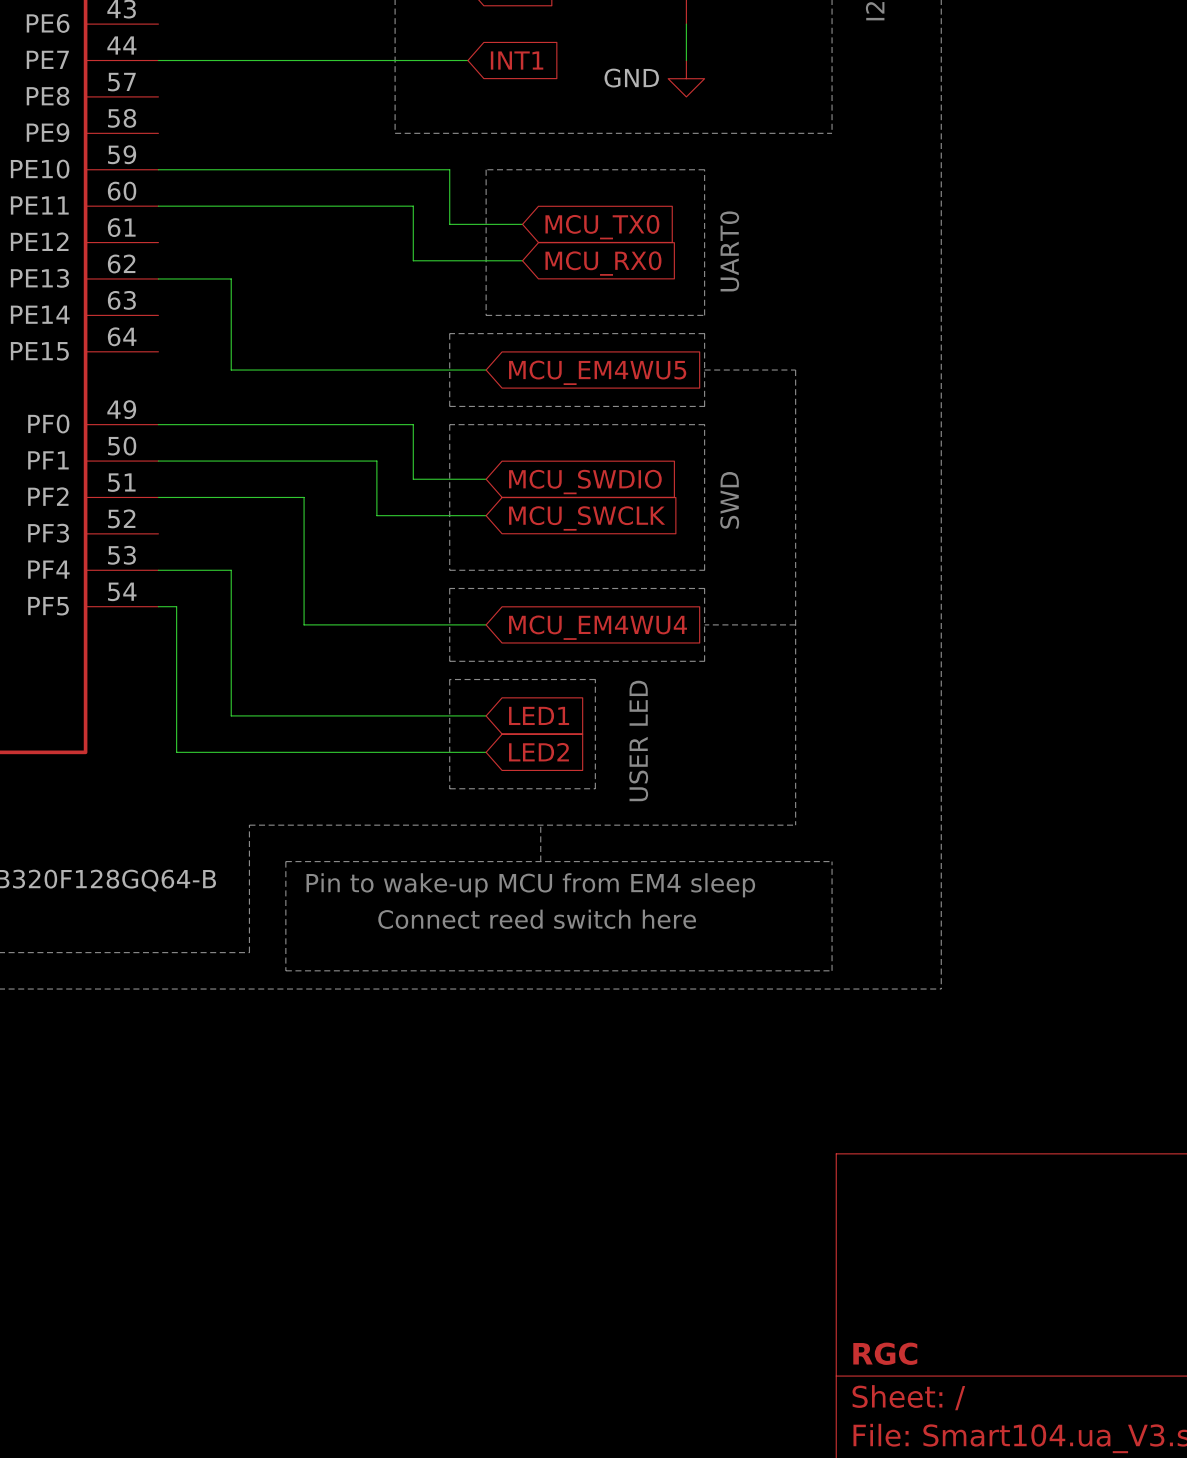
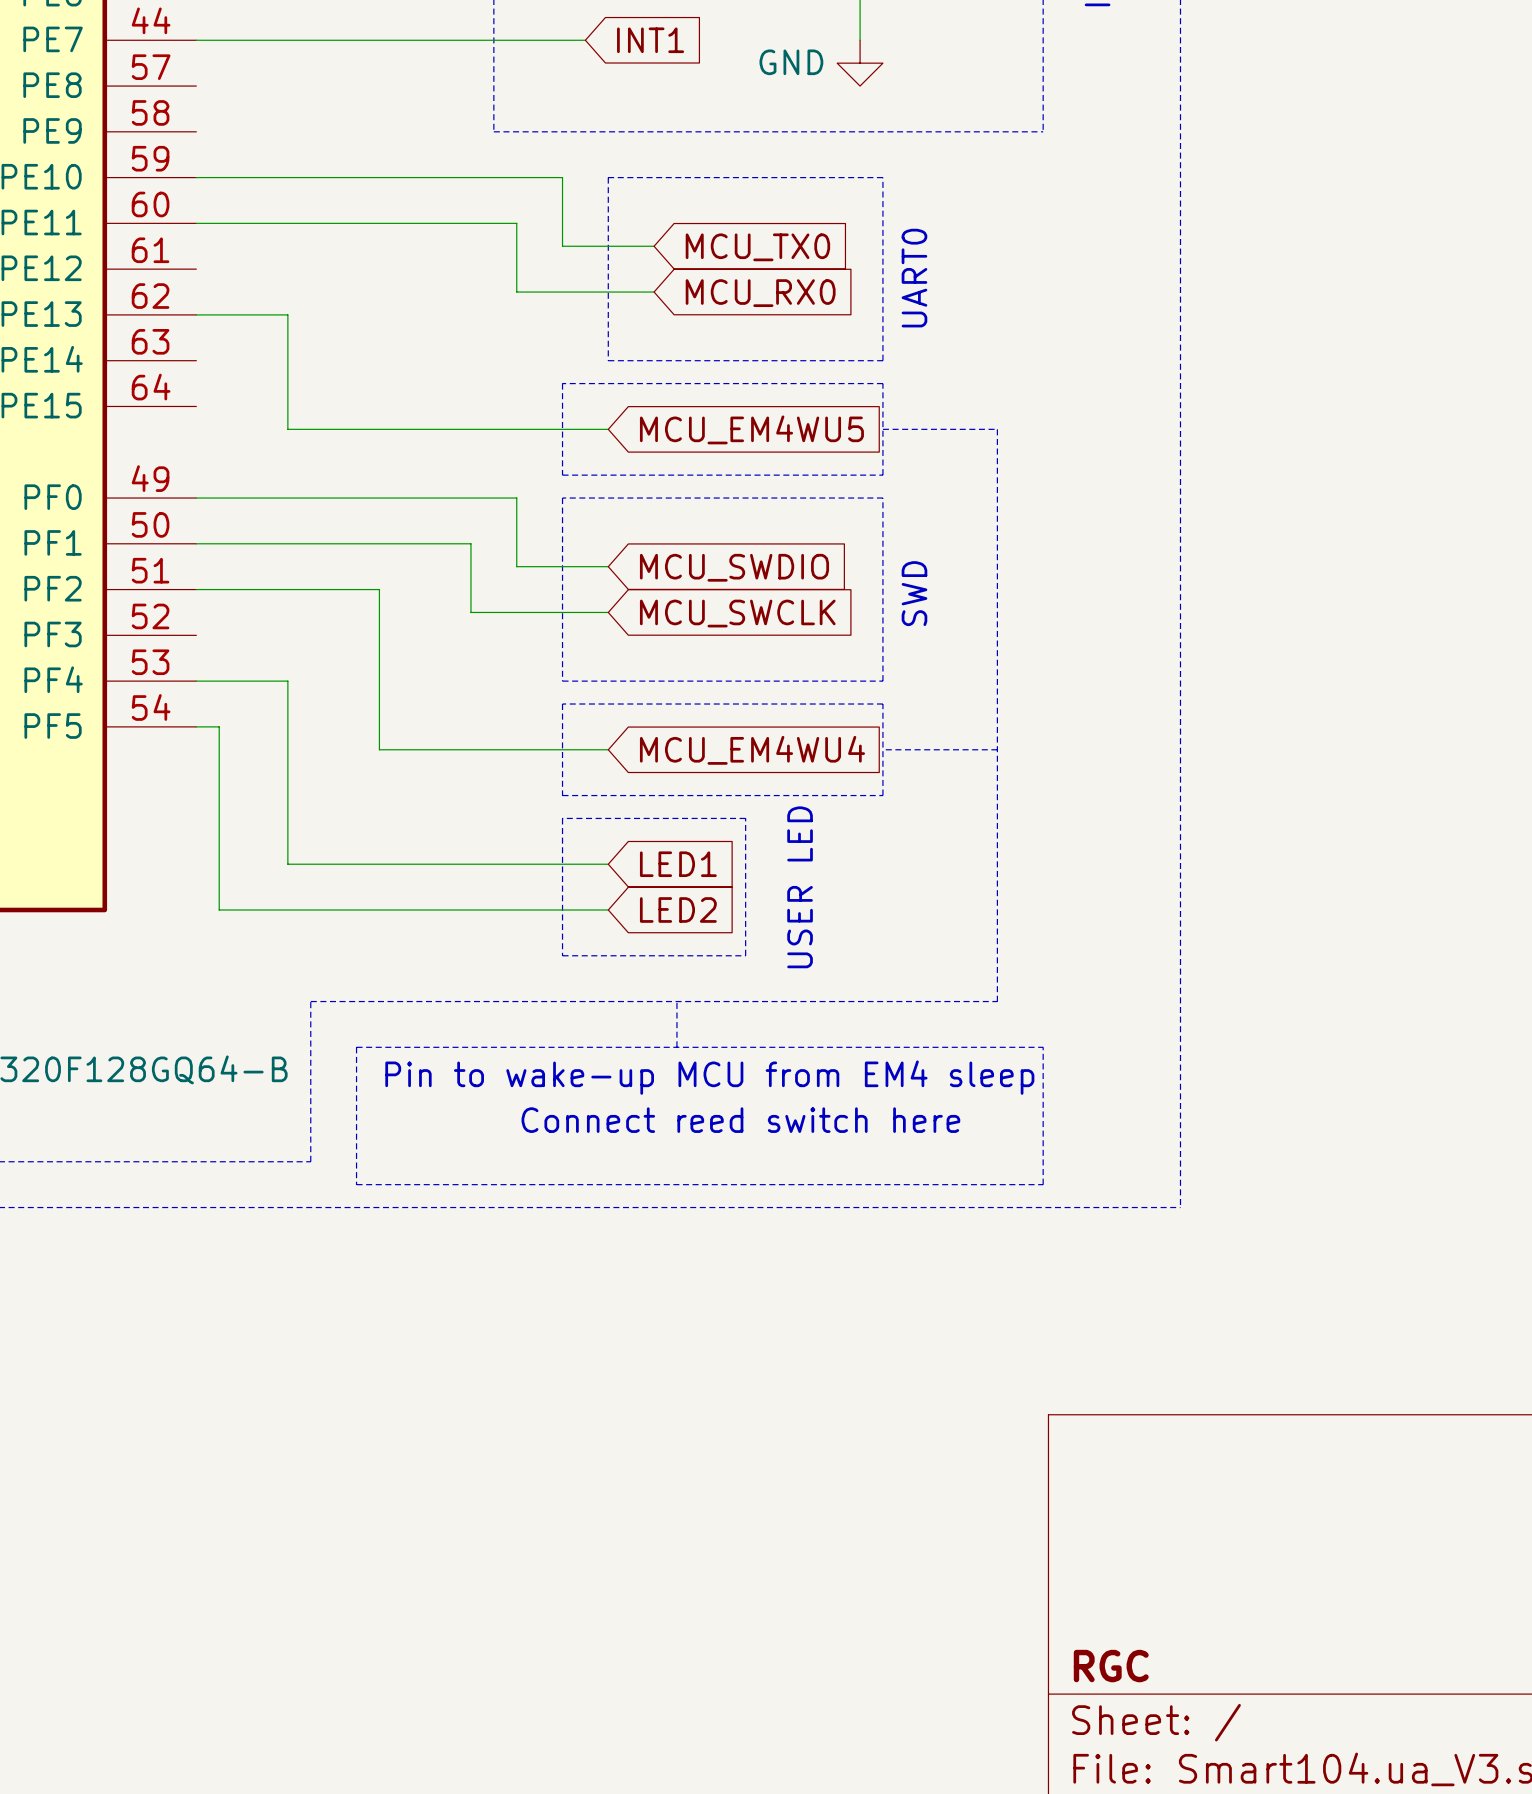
text position: Connect reed switch here (537, 919) -> Connect reed switch here (740, 1120)

